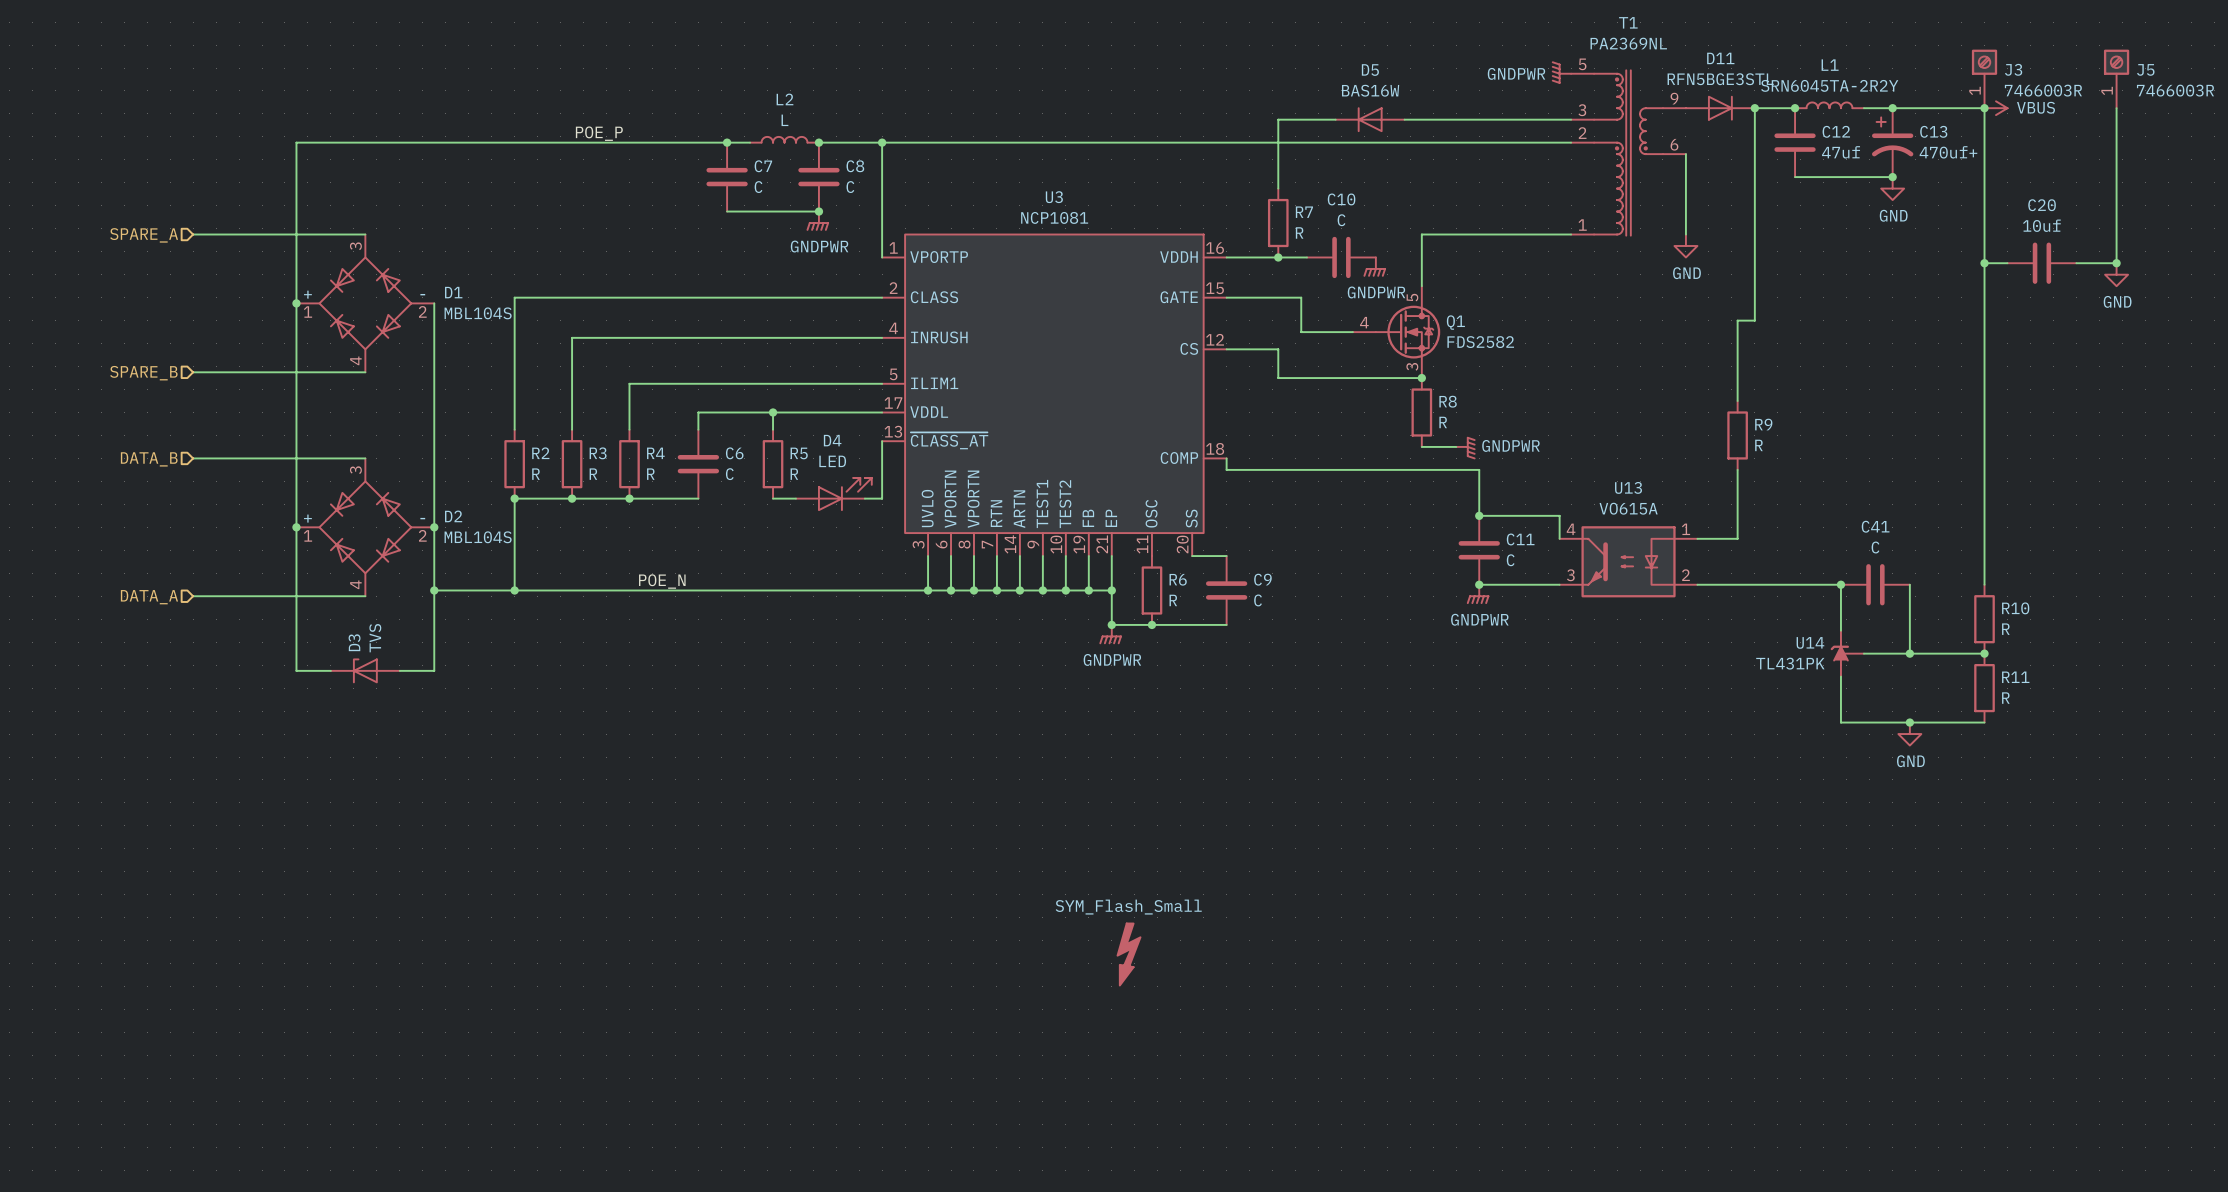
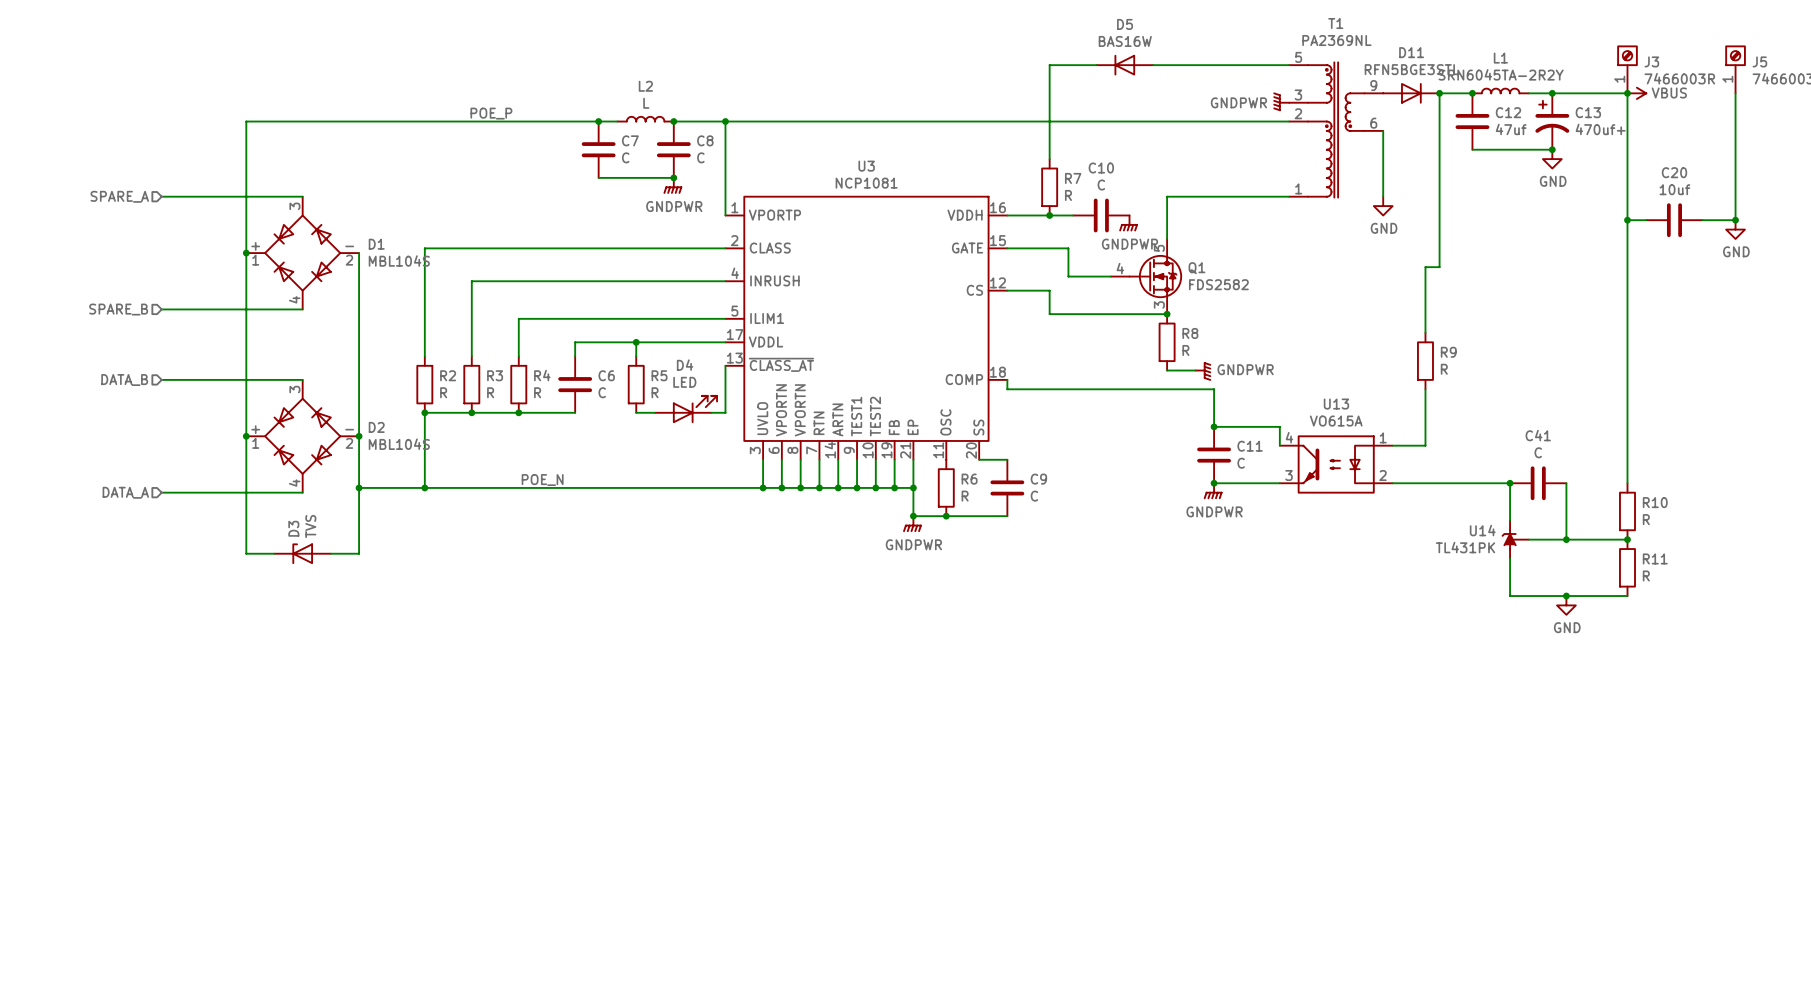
power symbol position: GNDPWR (1561, 72) -> GNDPWR (1281, 101)
wire: (1278, 119) (1335, 119) -> (1049, 102) (1049, 65) (1096, 65)
D5 position: (1370, 119) -> (1124, 65)
wire: (1404, 119) (1571, 119) -> (1153, 65) (1289, 65)
power symbol: SYM_Flash_Small (1129, 954) -> none

